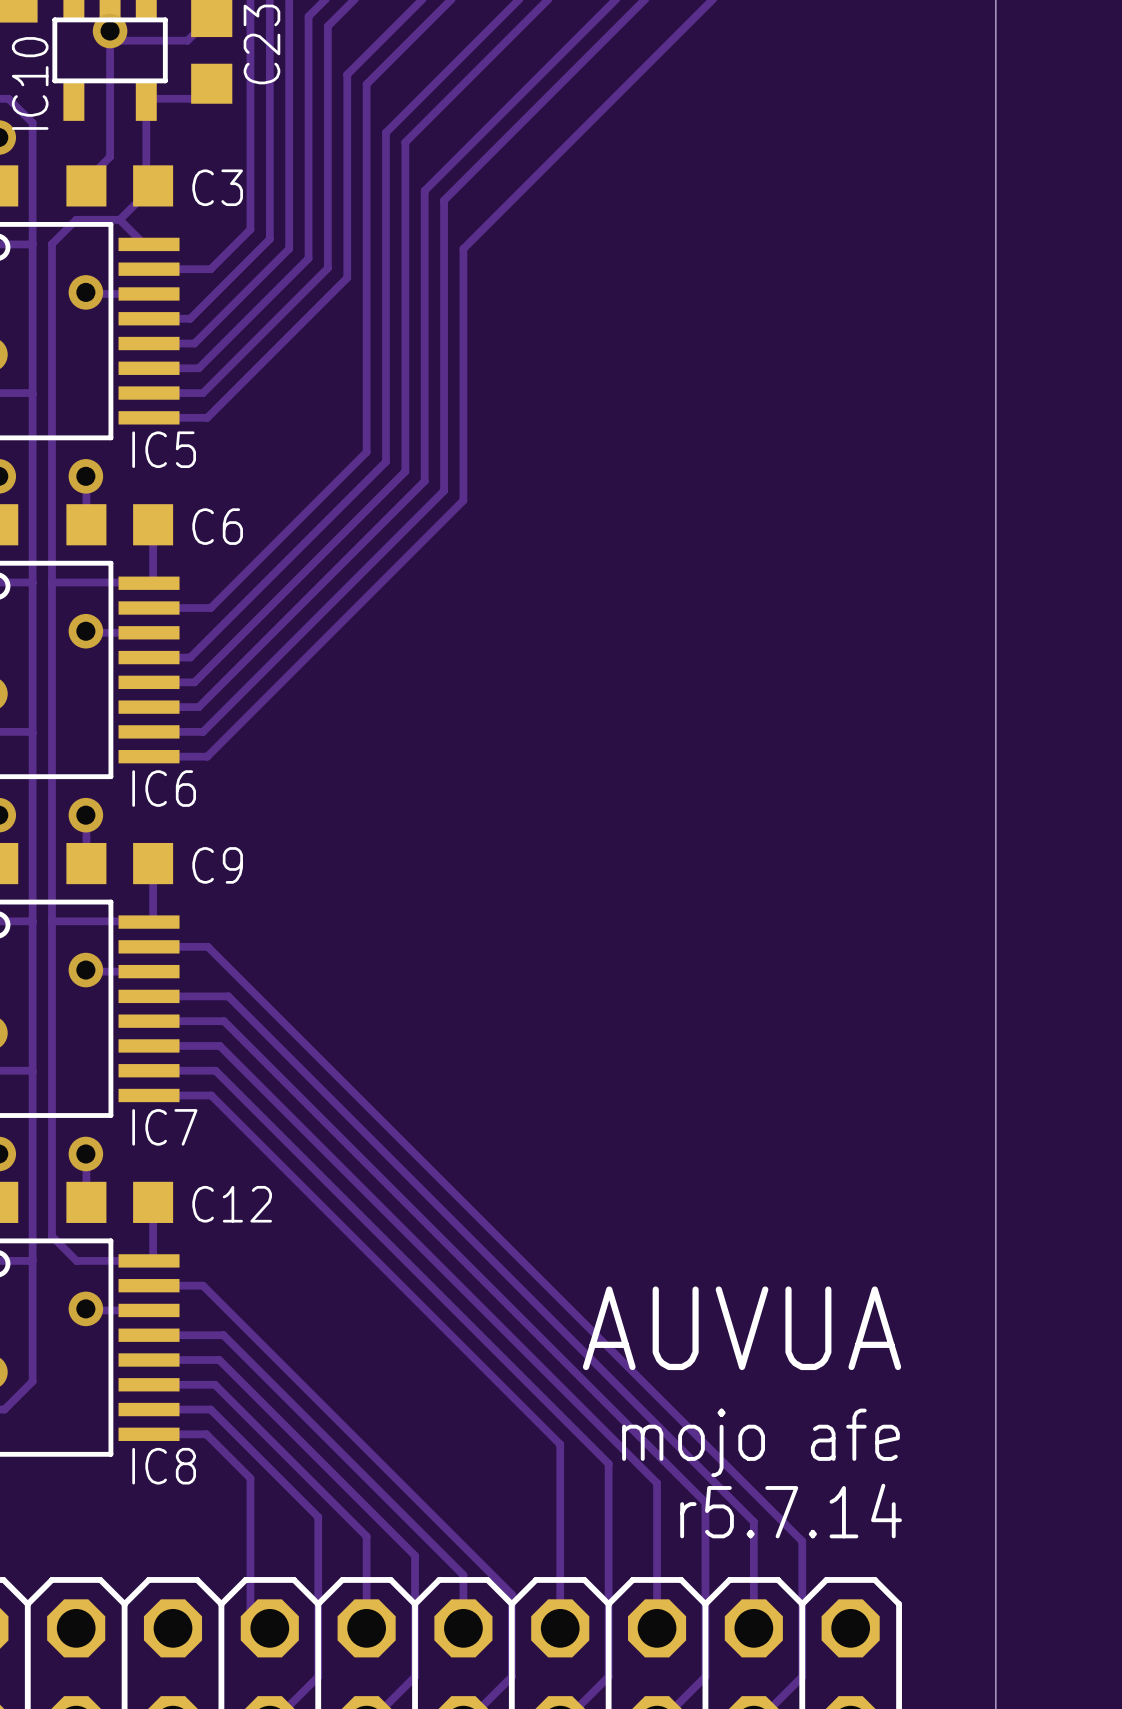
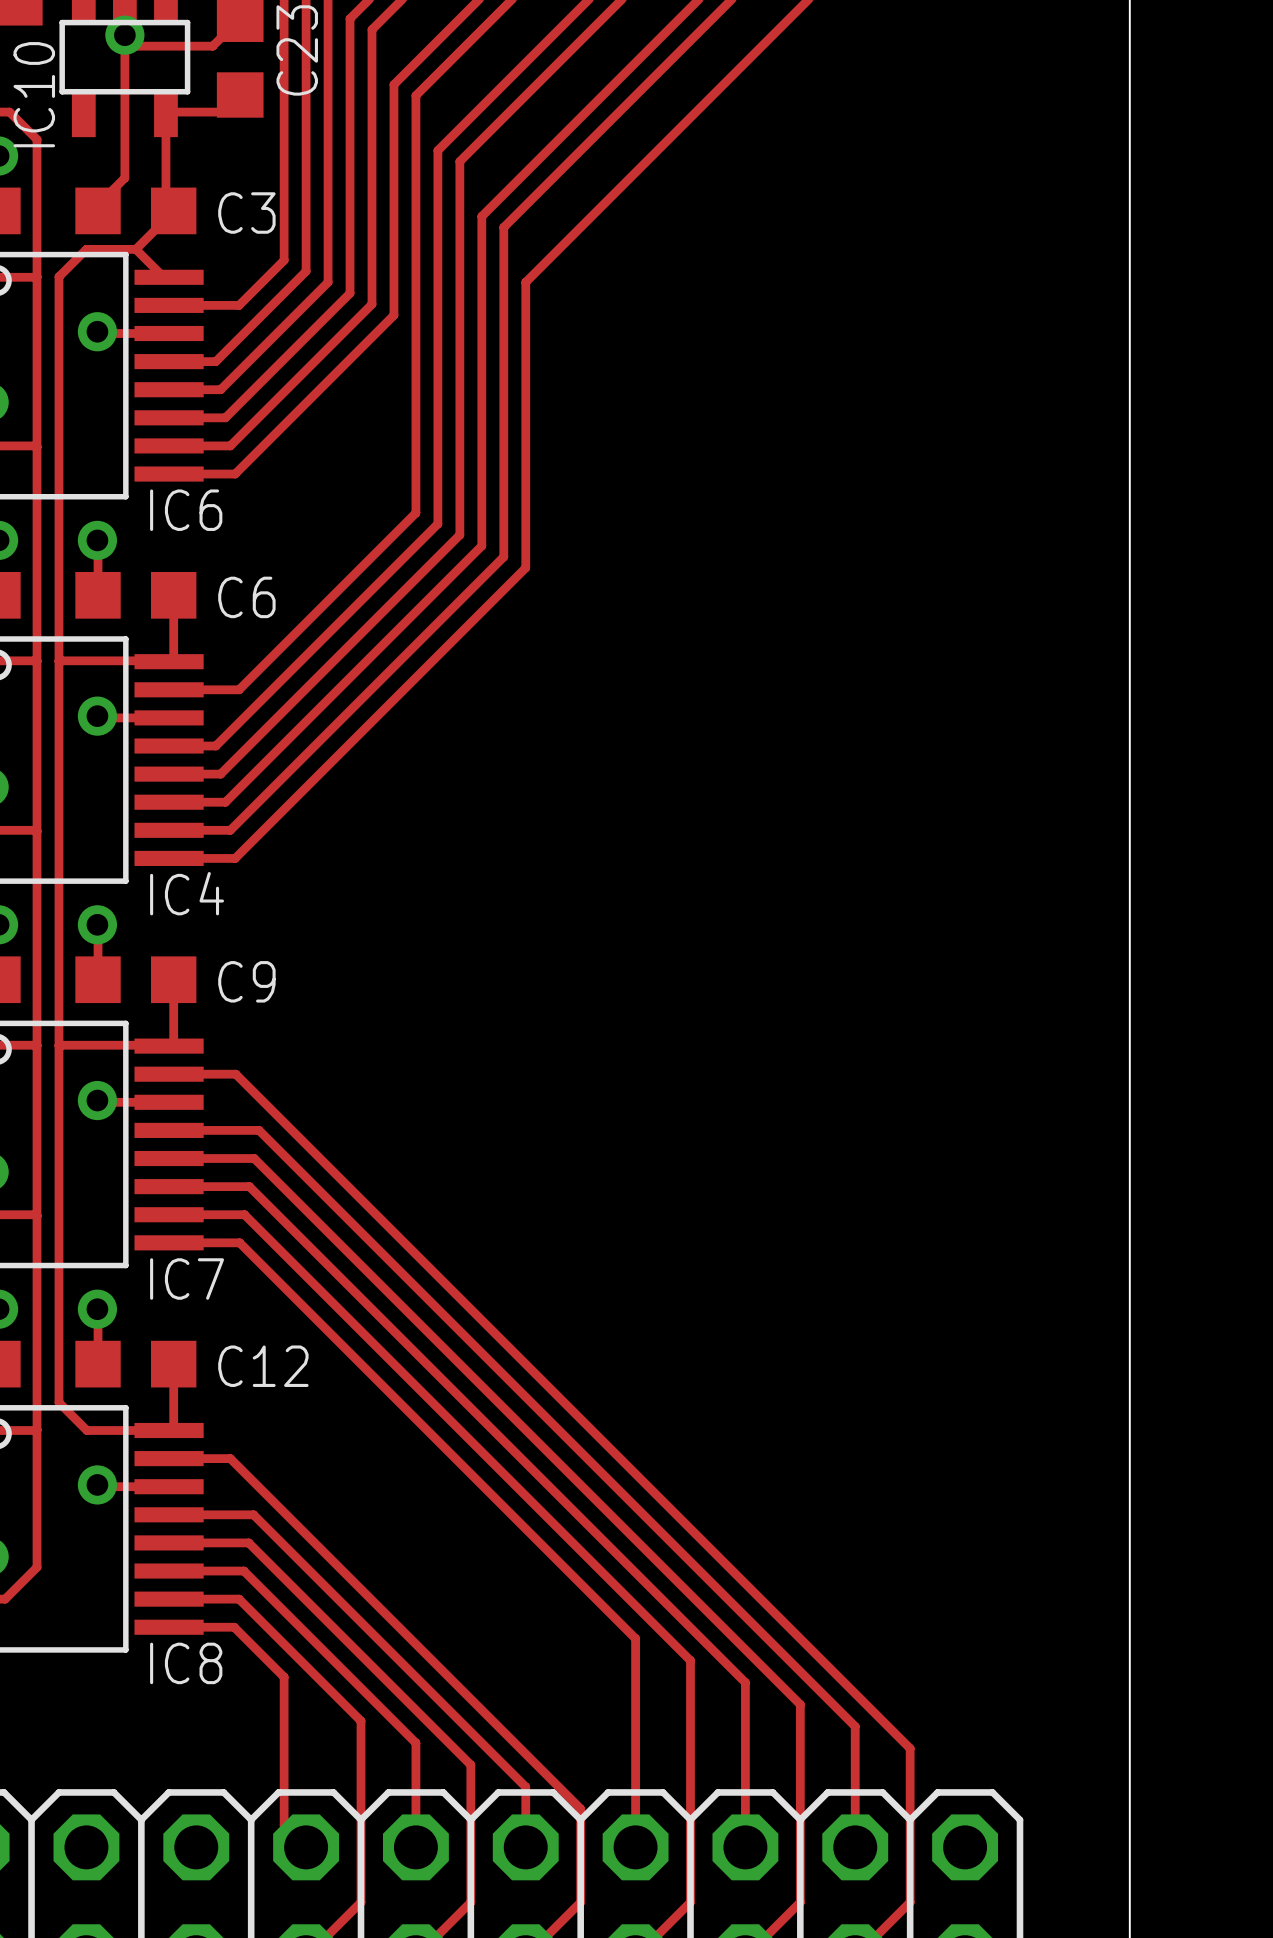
IC5 name: IC5 (164, 449) -> IC6 (186, 510)
IC6 name: IC6 (164, 788) -> IC4 (187, 893)
text: AUVUA (742, 1328) -> none
text: mojo afe (760, 1442) -> none
text: r5.7.14 (791, 1511) -> none

